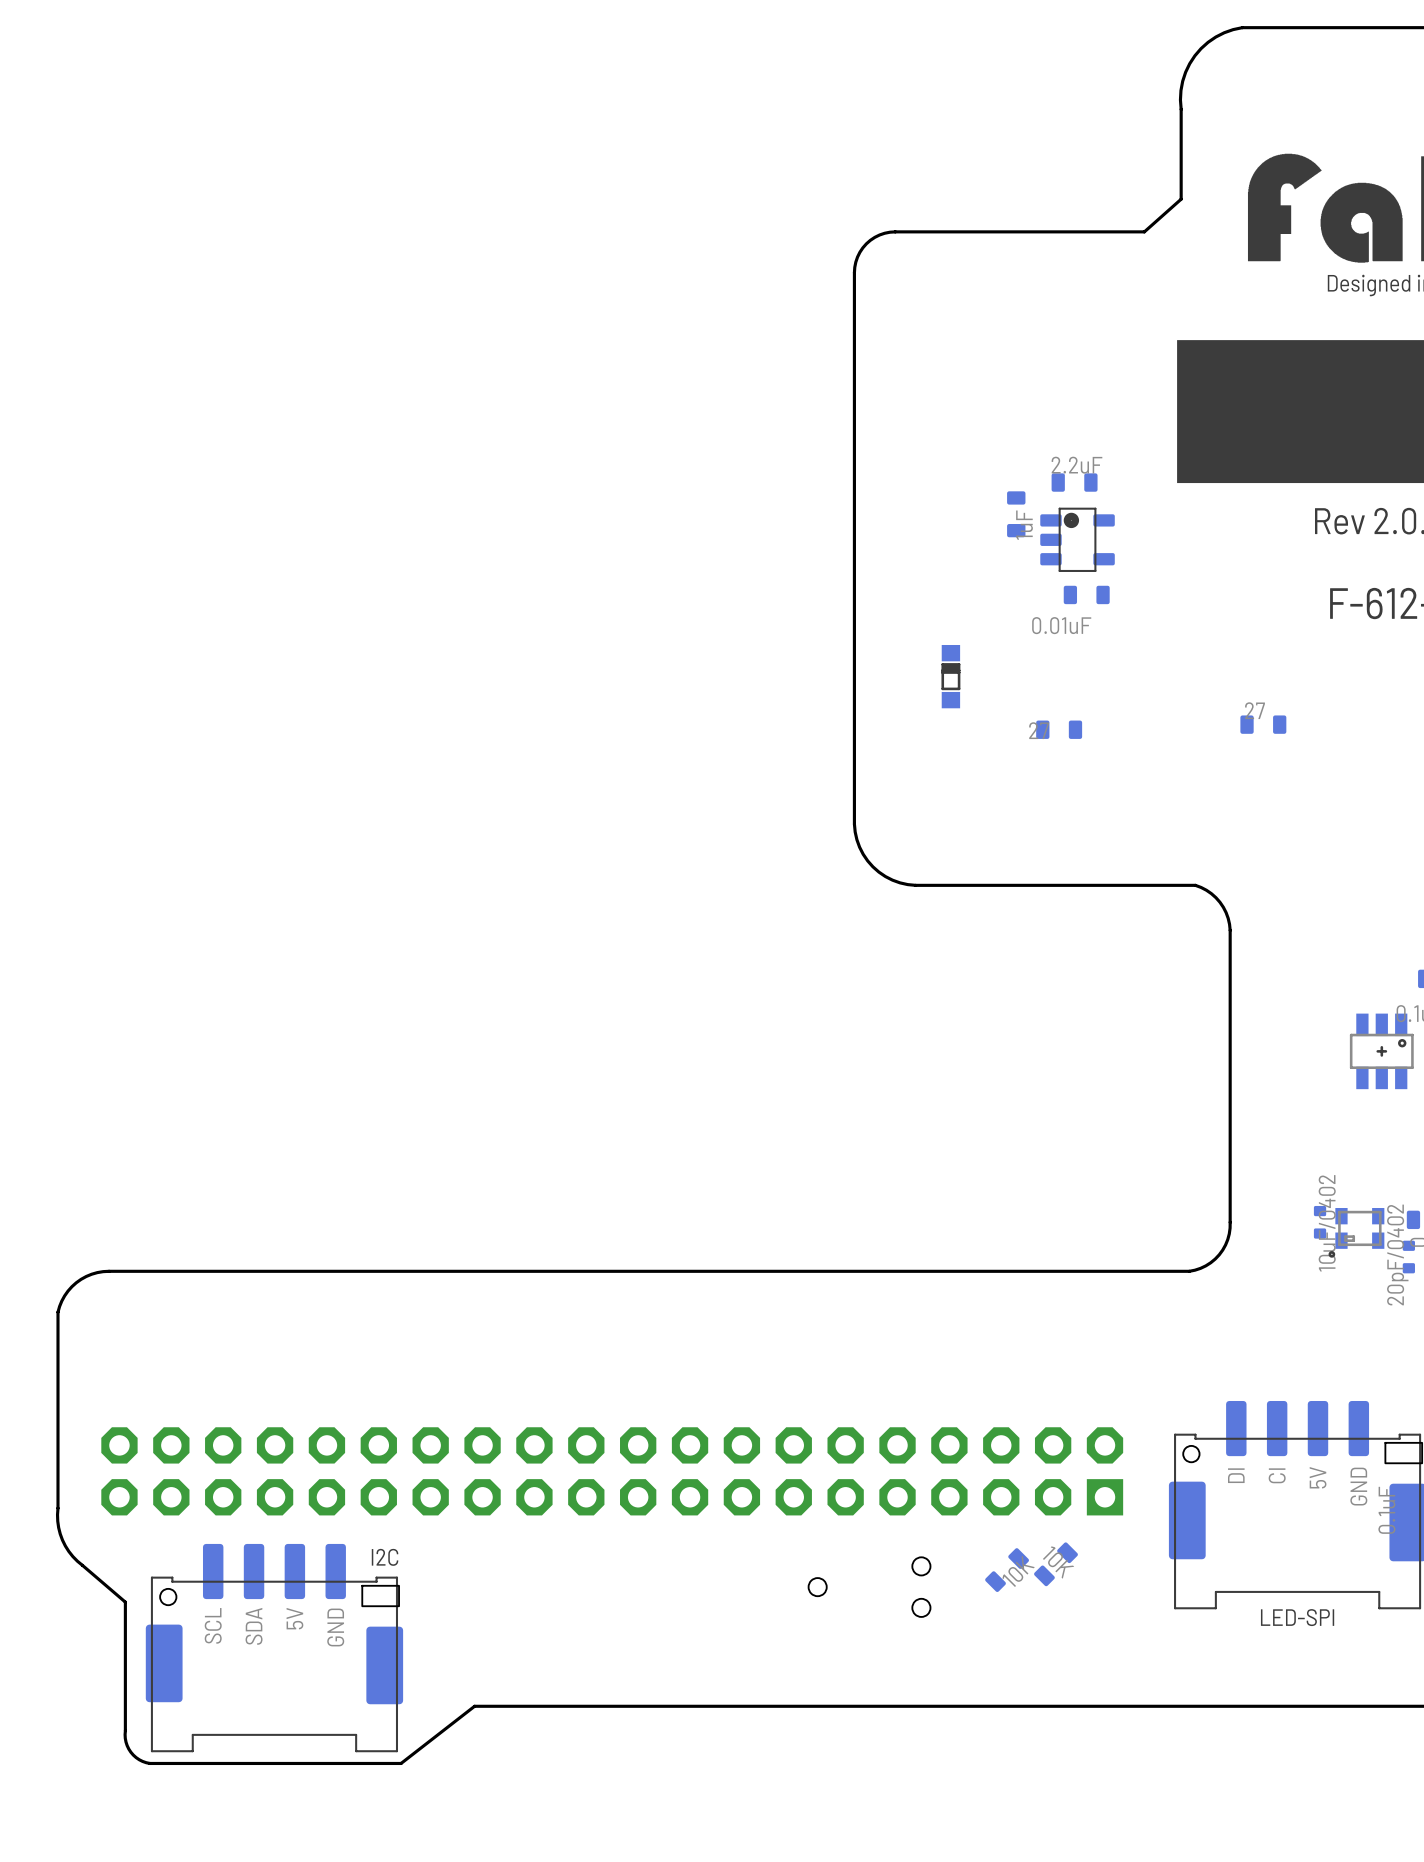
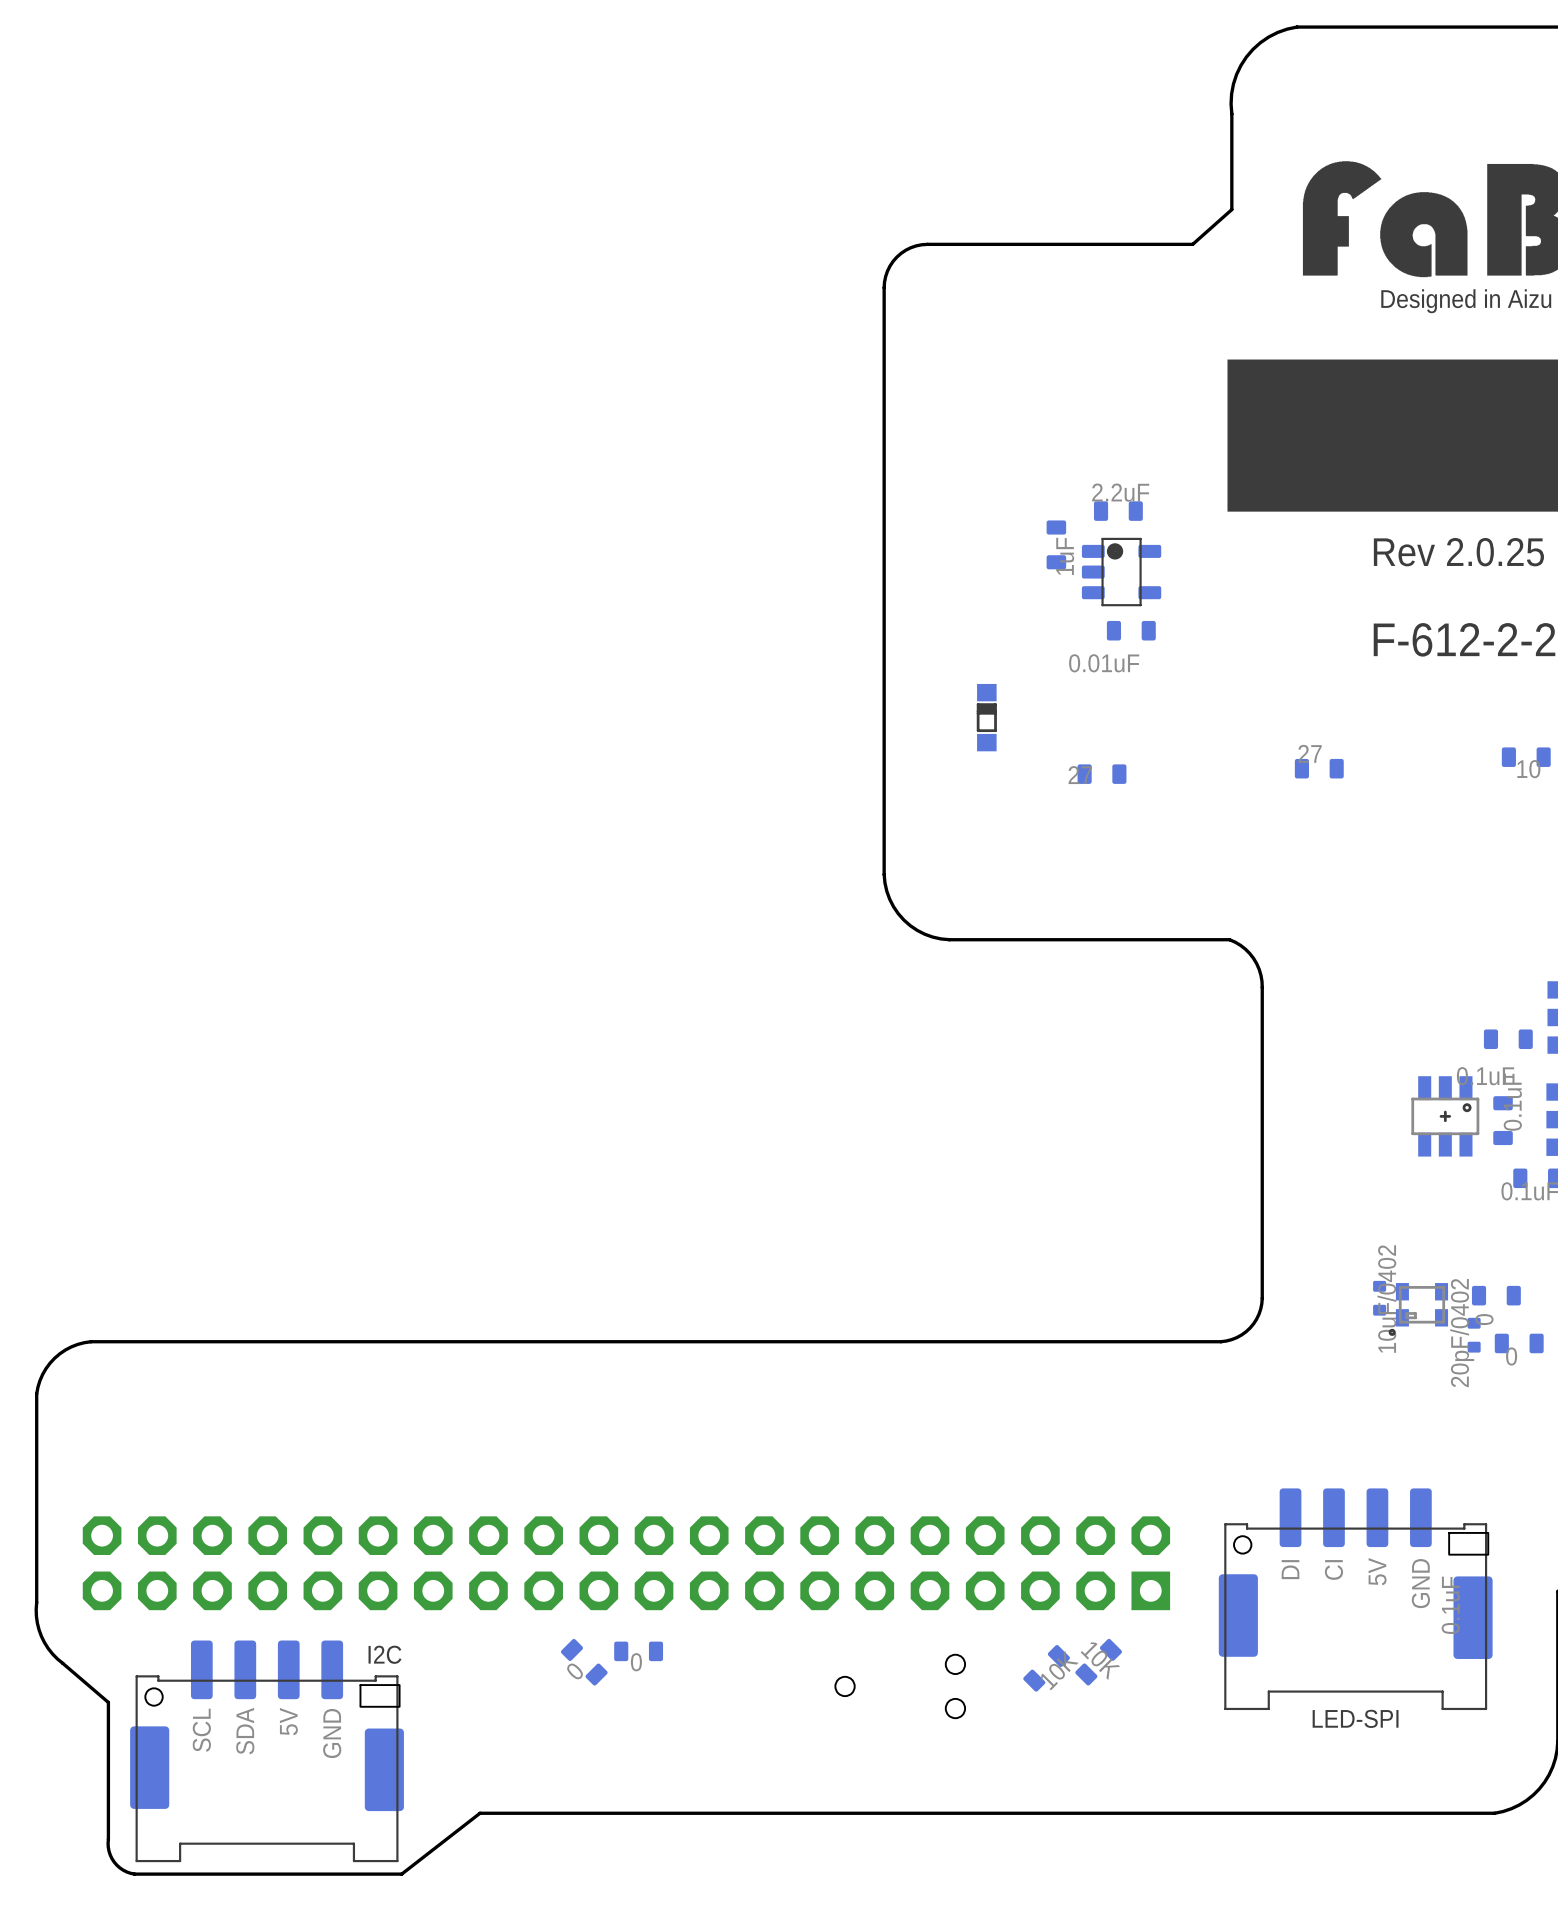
board edge: (1179, 885) (1195, 885) (1211, 893) (1226, 912) (1230, 930) (1230, 1228) (1225, 1244) (1219, 1254) (1200, 1268) (1189, 1271) (109, 1271) (91, 1274) (76, 1282) (64, 1295) (57, 1312) -> (1229, 939) (1240, 945) (1253, 958) (1260, 975) (1262, 987) (1261, 1303) (1258, 1314) (1250, 1328) (1231, 1339) (1220, 1341) (91, 1341) (71, 1346) (54, 1358) (42, 1374) (36, 1393)
part: none -> 0 (638, 1651)
part: none -> 0 (584, 1662)

